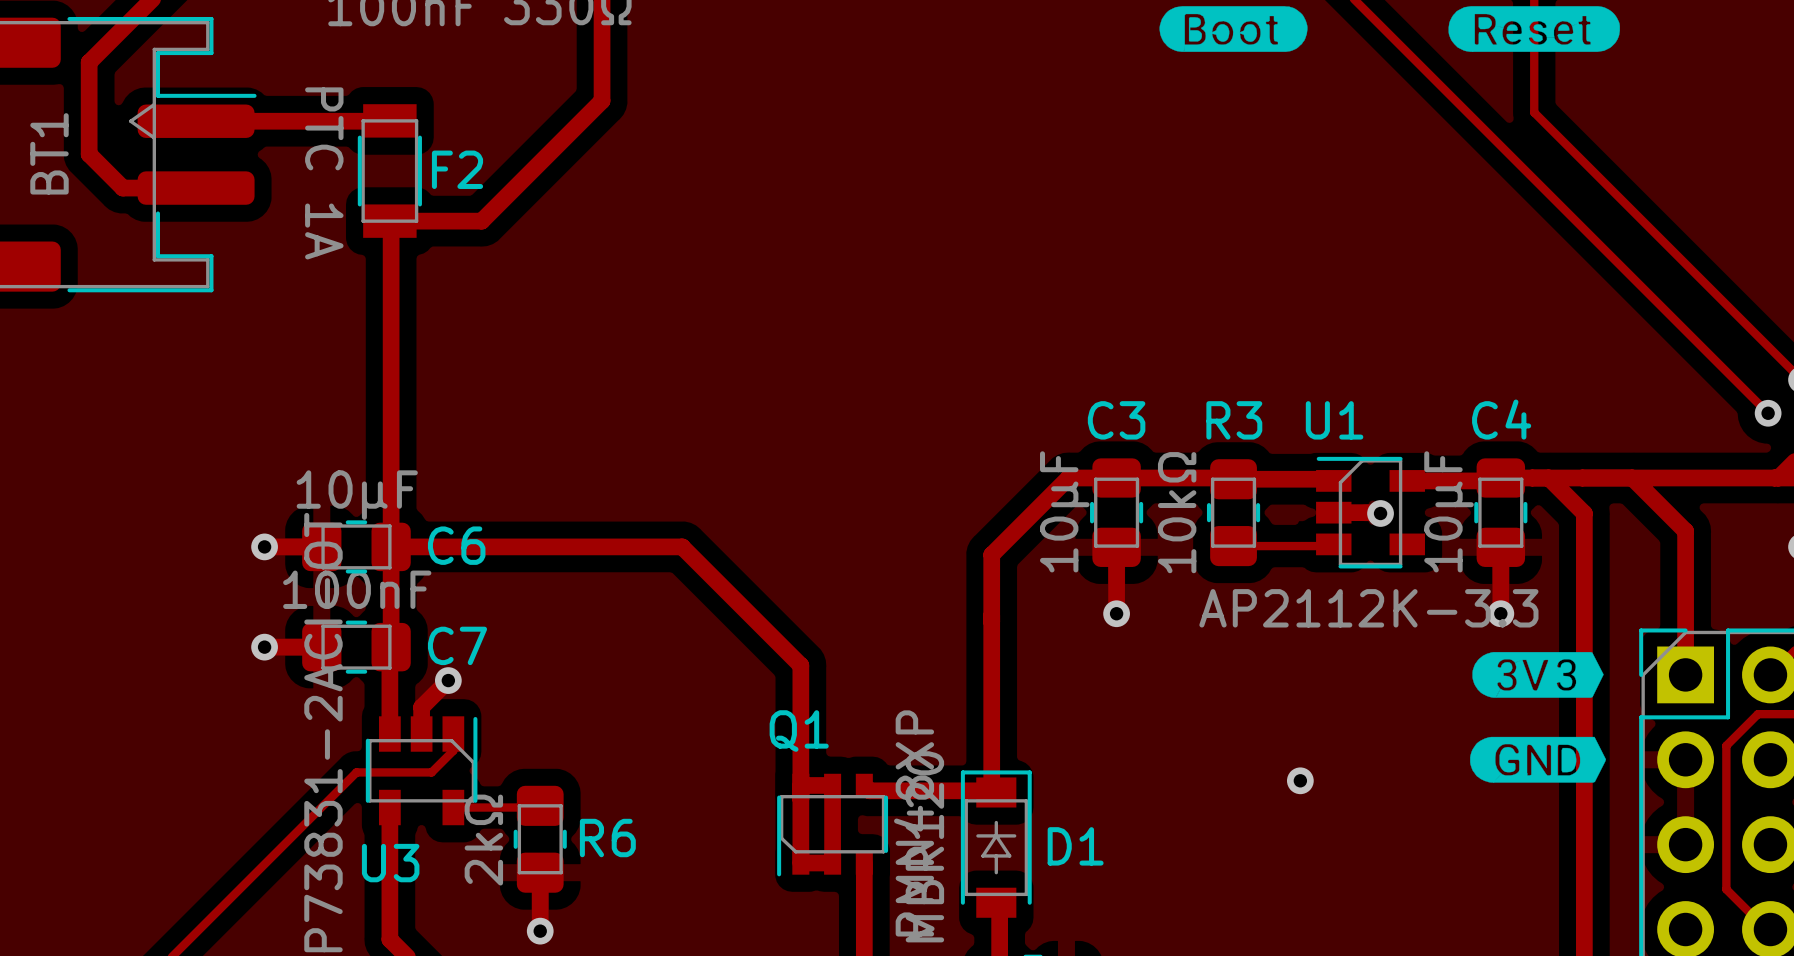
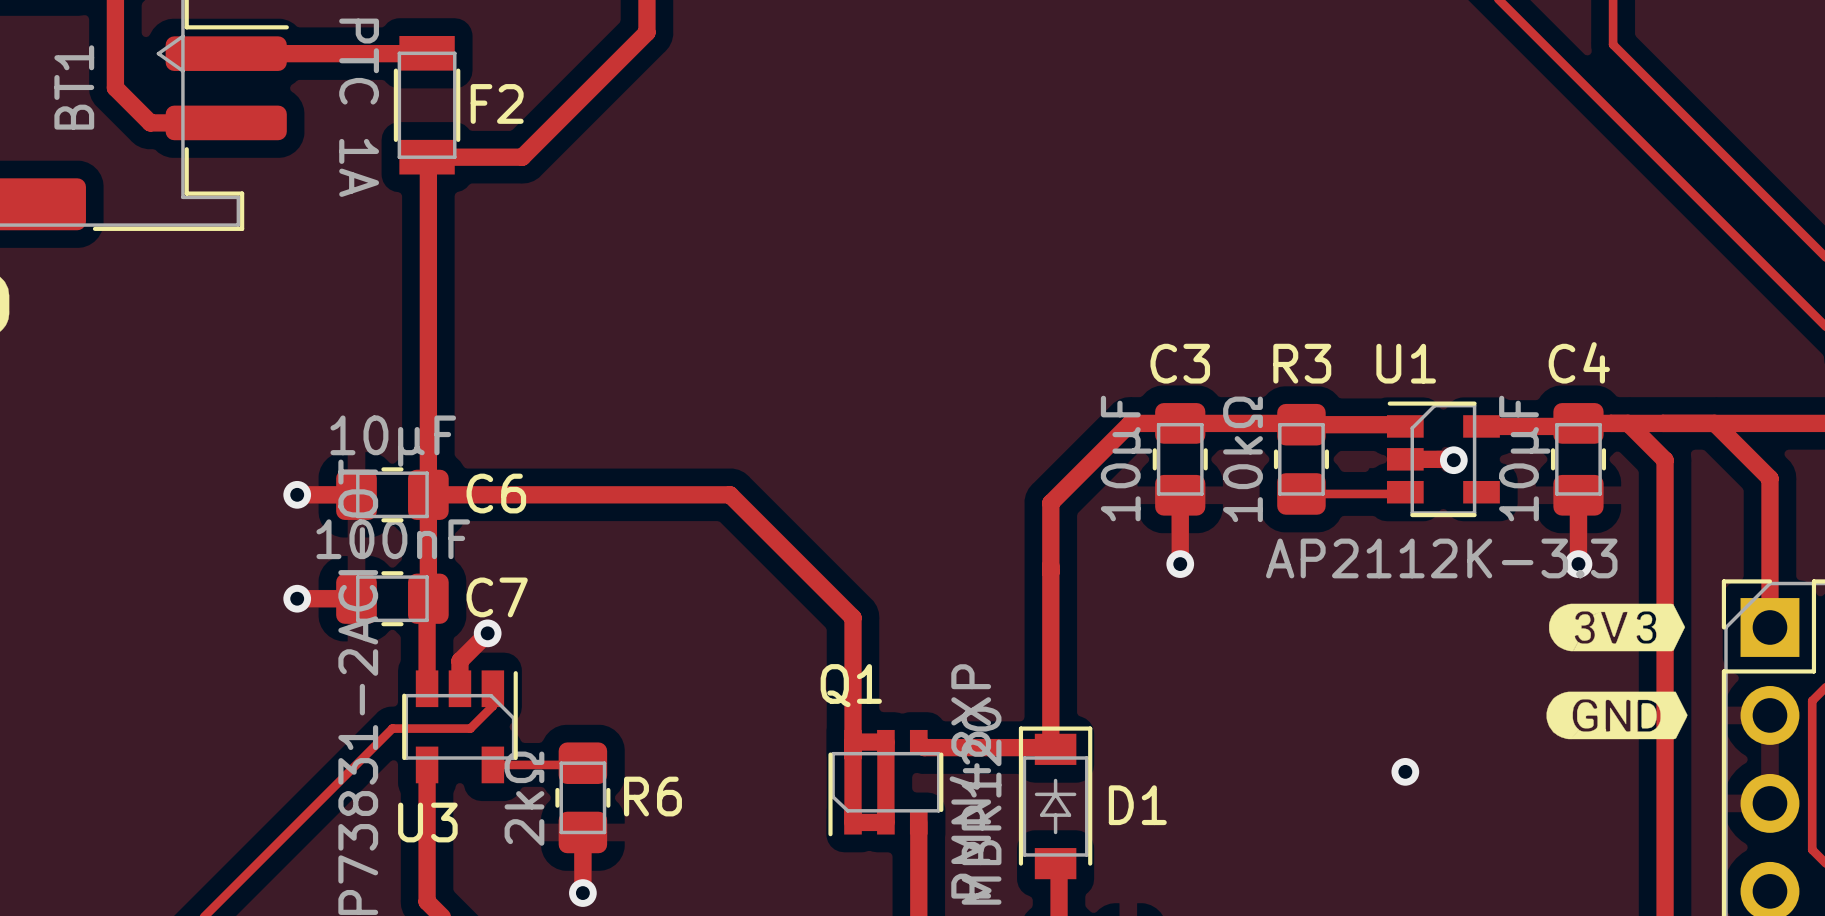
via position: (1300, 780) -> (1405, 771)

